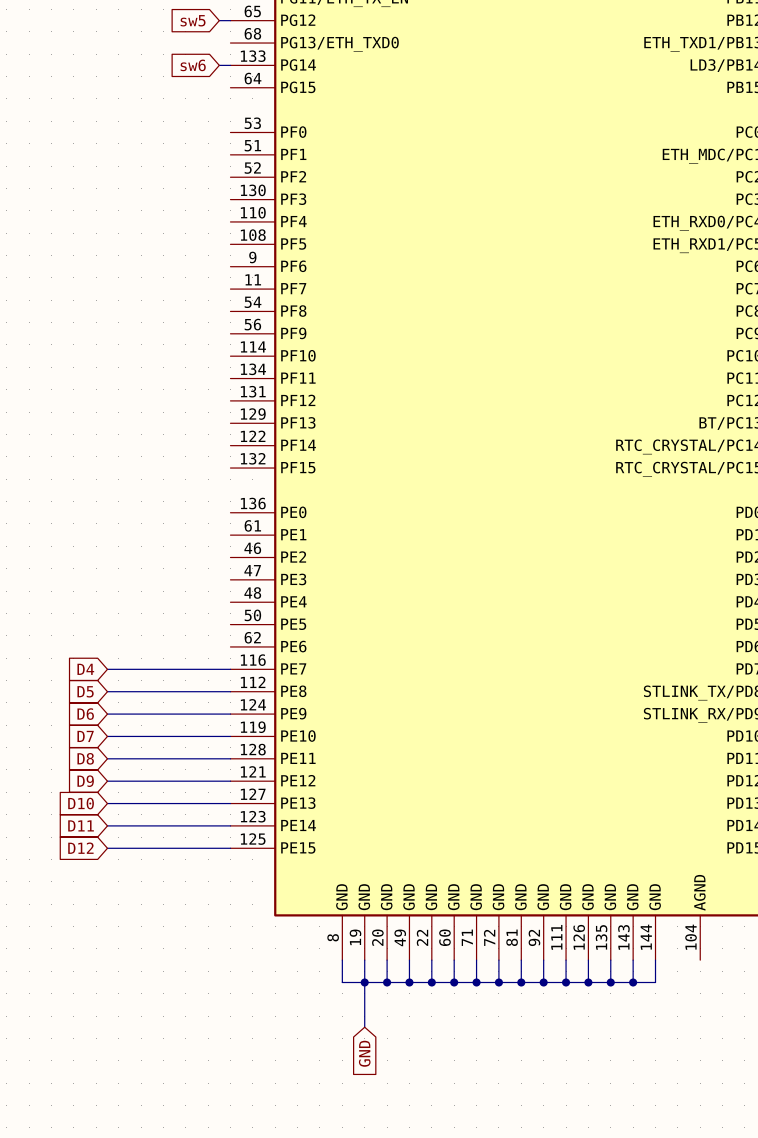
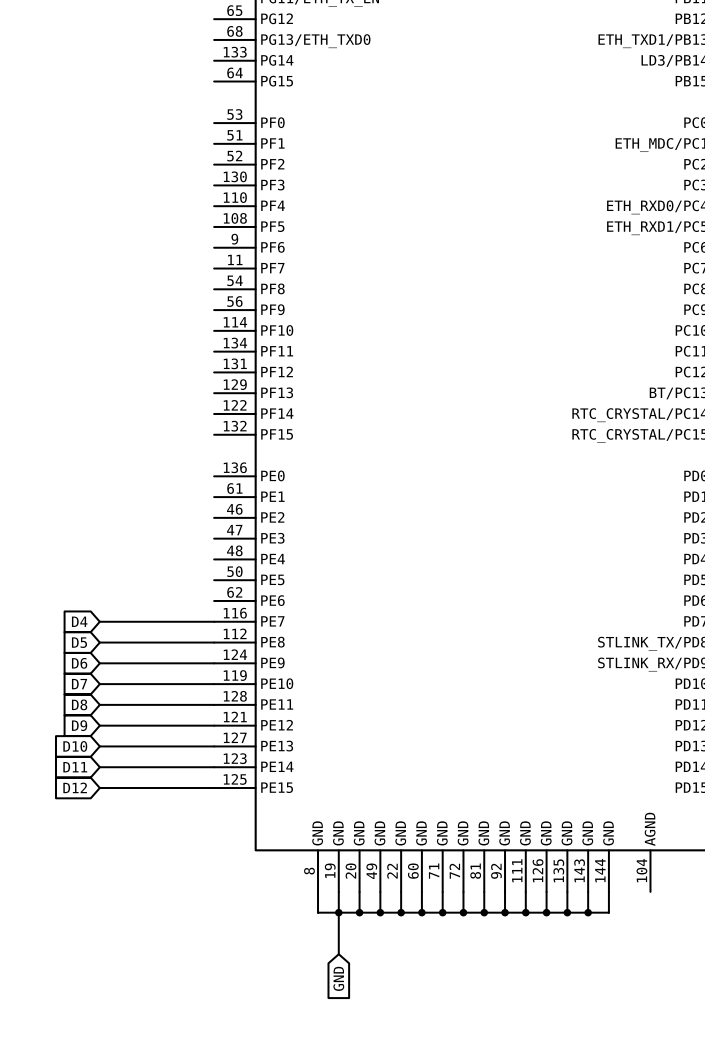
global label: sw5 (193, 20) -> none
wire: (219, 20) (230, 20) -> none
global label: sw6 (193, 65) -> none
wire: (219, 65) (230, 65) -> none

